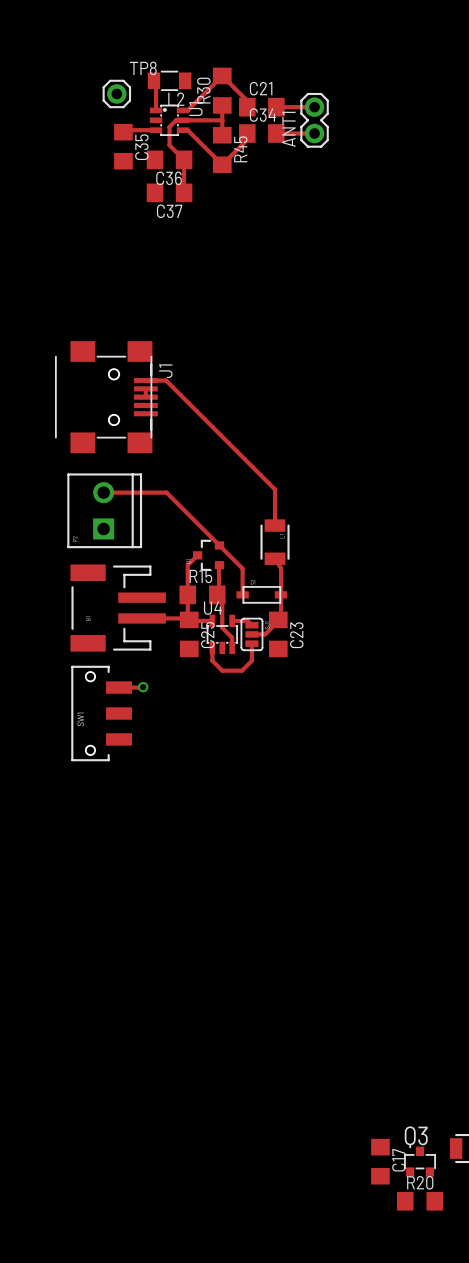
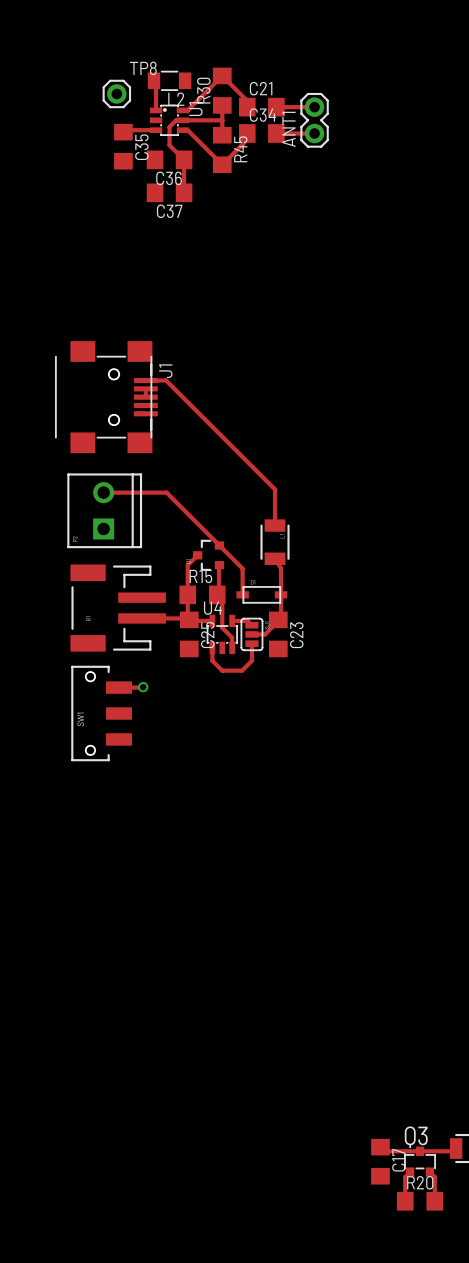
track: none -> (380, 1147) (384, 1151) (453, 1151) (456, 1148)
track: none -> (410, 1172) (405, 1176) (405, 1201)
track: none -> (429, 1172) (434, 1176) (434, 1201)

